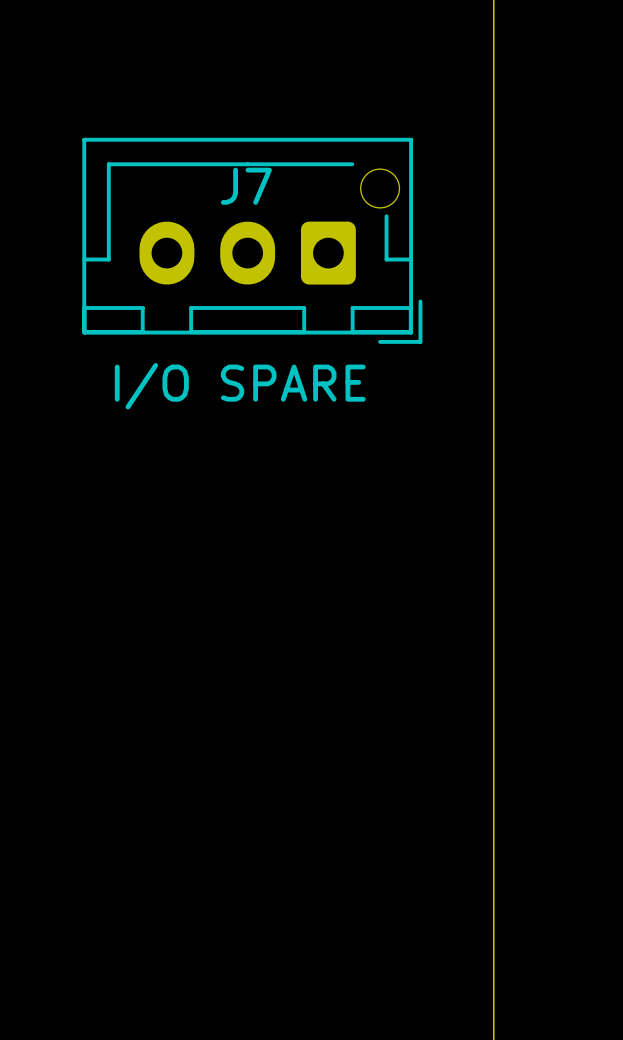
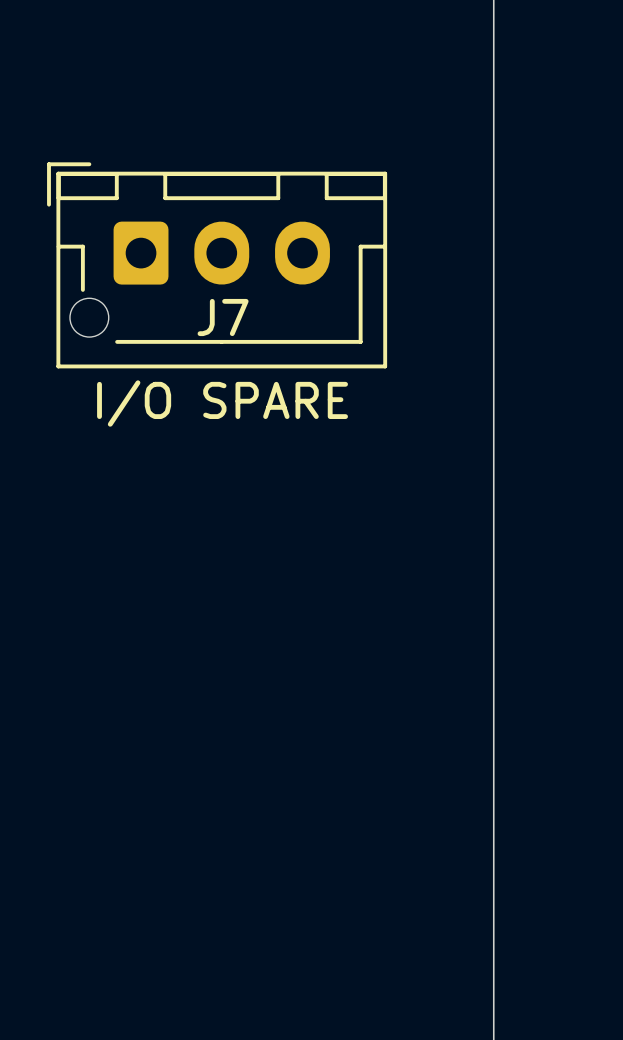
J7 rotation: 0° (252, 240) -> 180° (217, 265)

